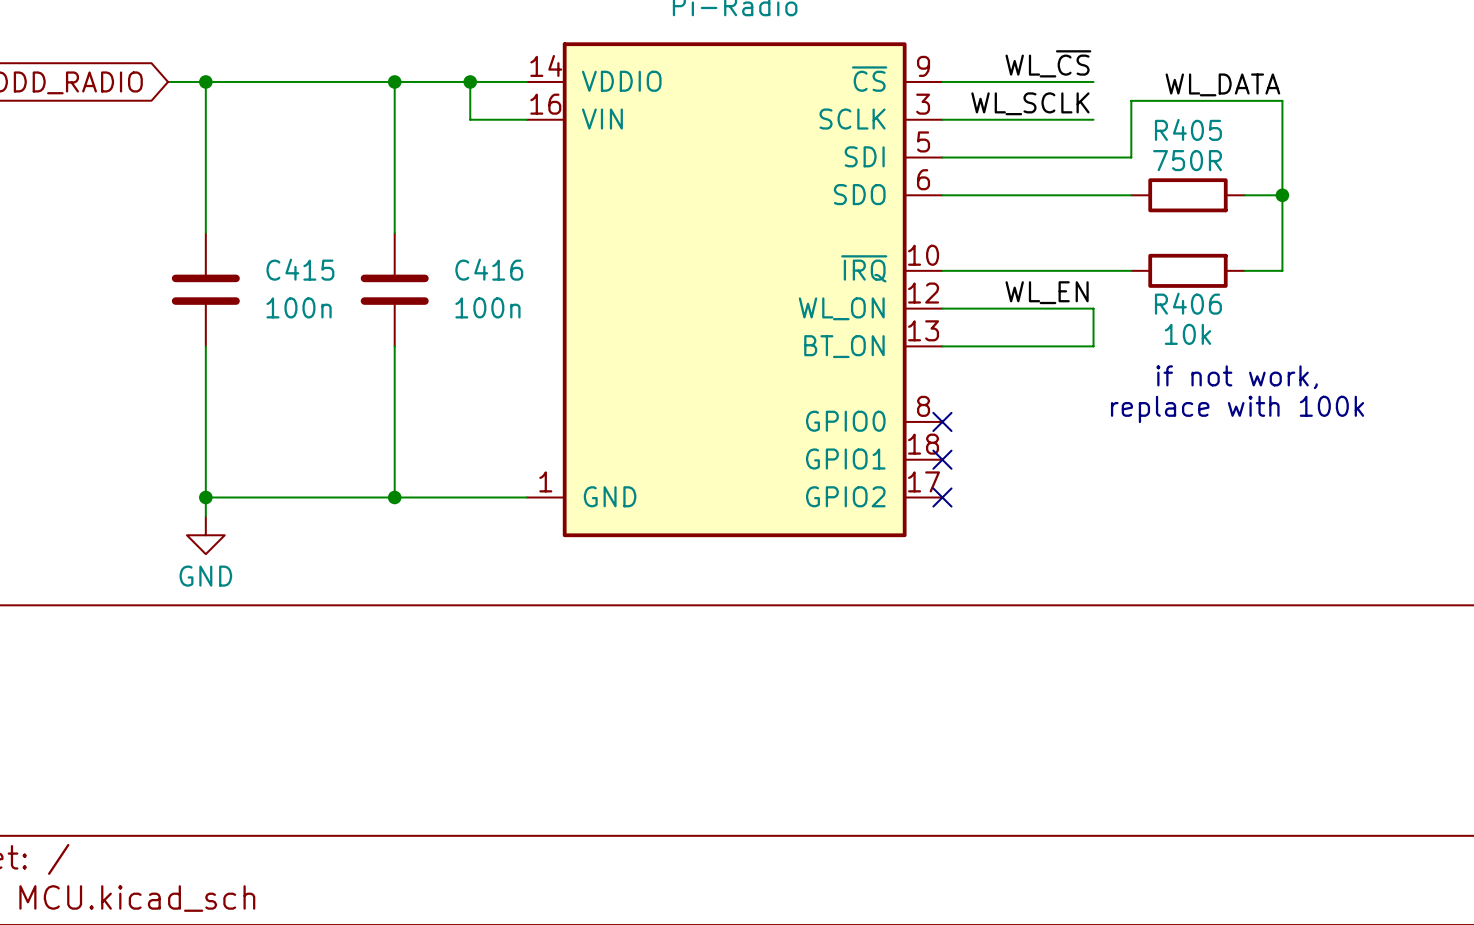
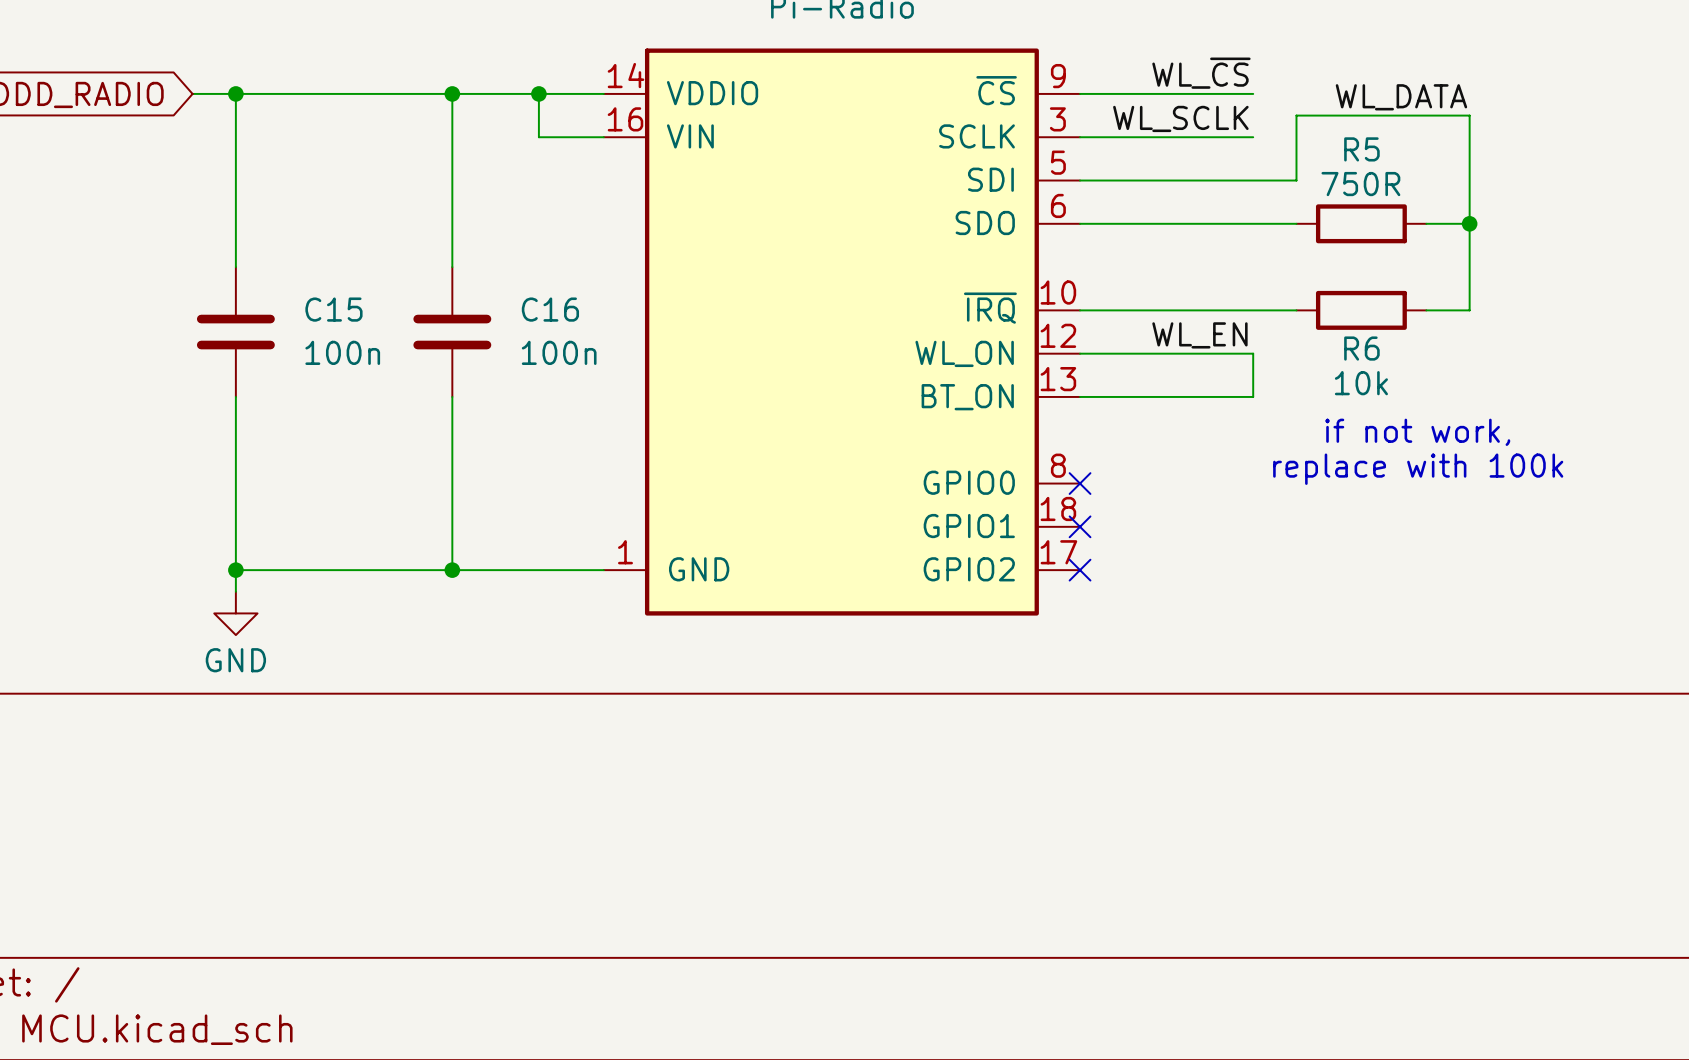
R405 name: R405 (1188, 129) -> R5 (1361, 149)
C415 name: C415 (300, 269) -> C15 (333, 309)
C416 name: C416 (489, 269) -> C16 (550, 309)
R406 name: R406 (1188, 303) -> R6 (1361, 348)

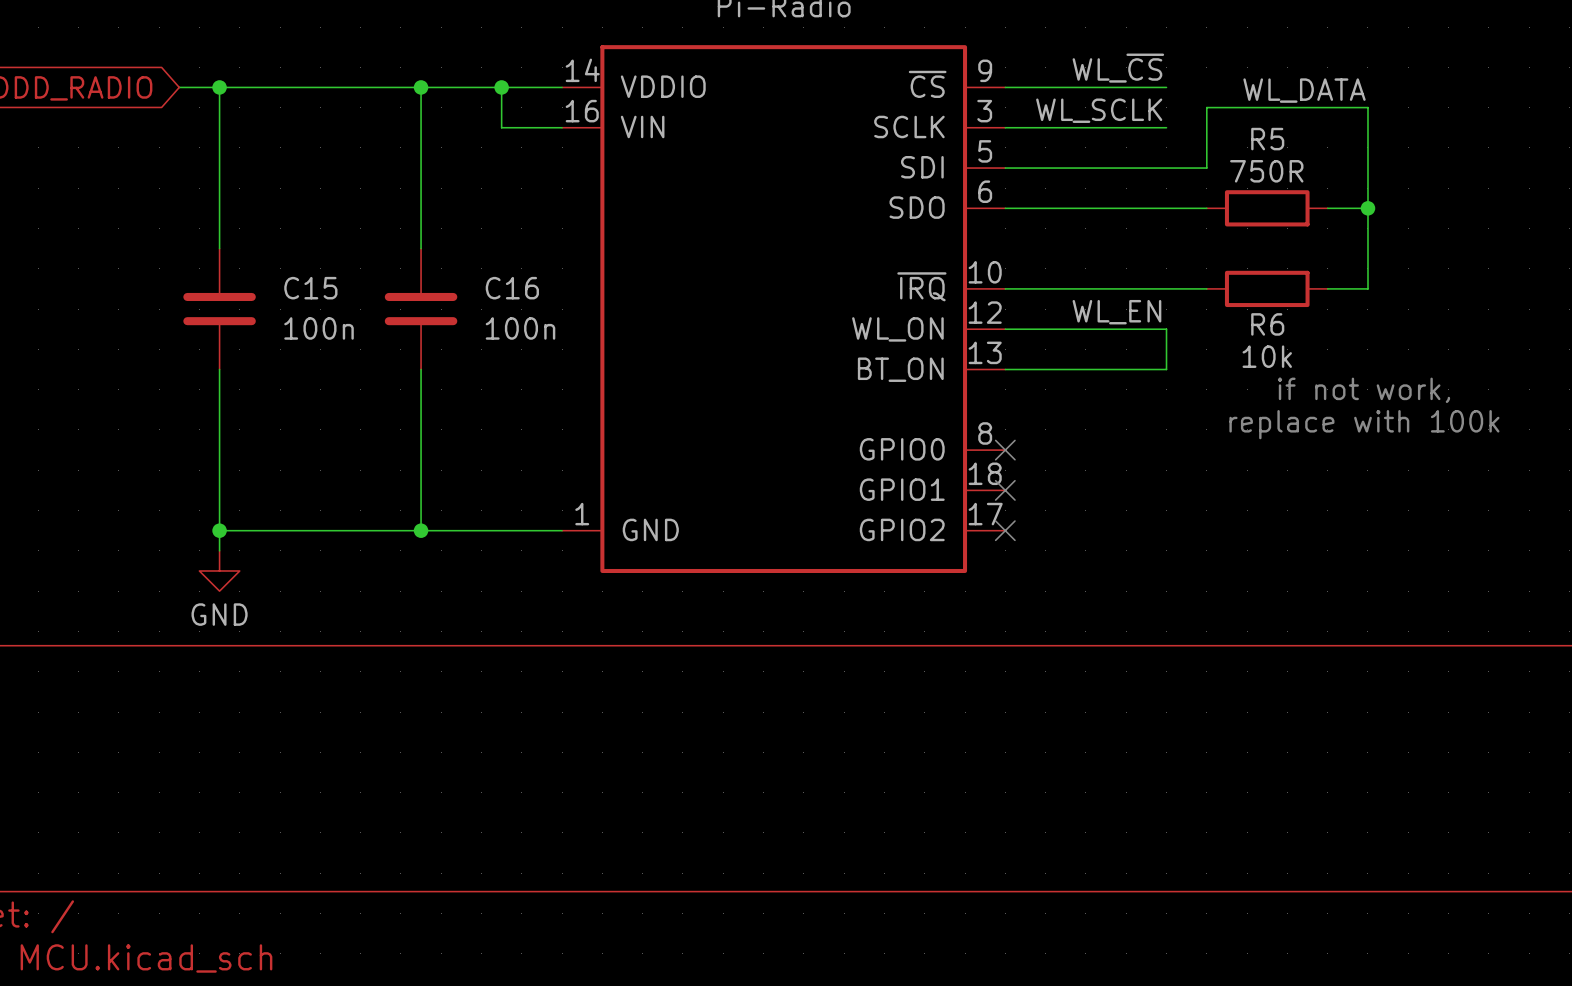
text position: if not work, (1417, 432) -> if not work, (1363, 390)
text position: replace with 100k (1418, 469) -> replace with 100k (1364, 424)

